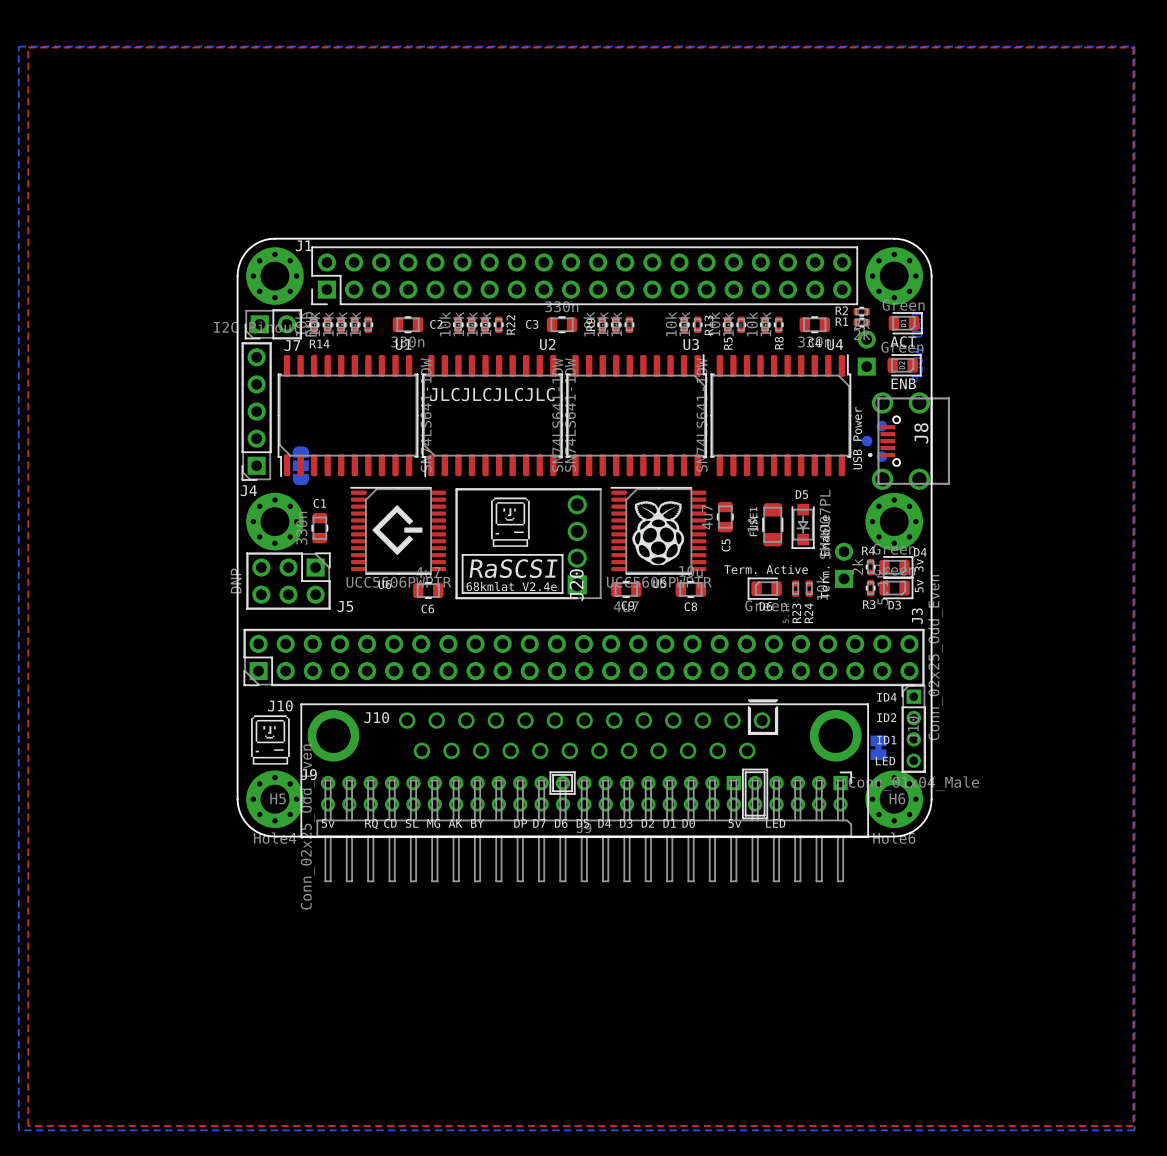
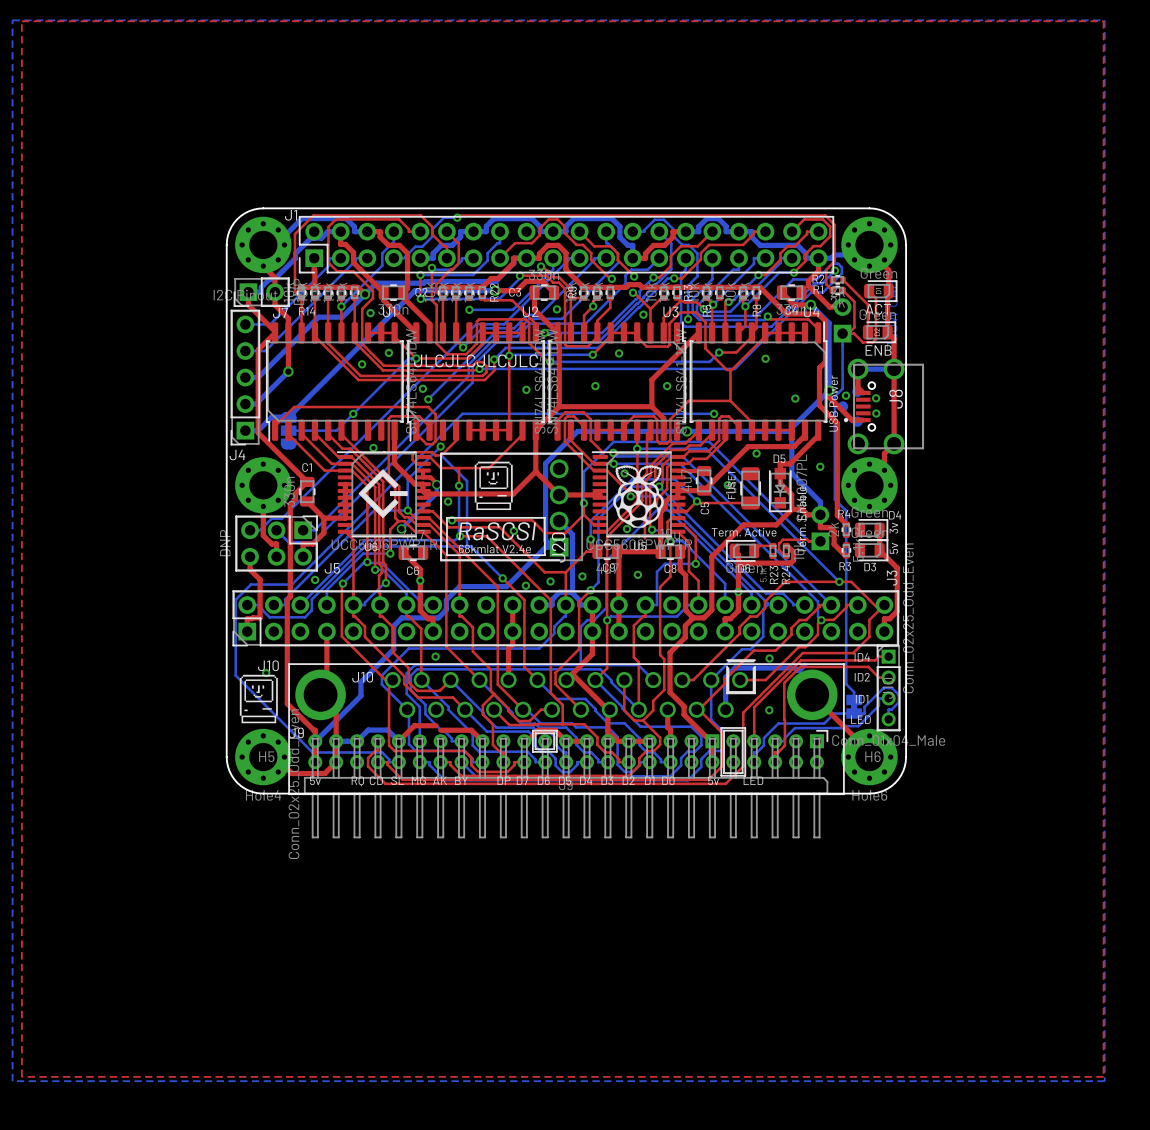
top track: none -> (457, 217) (459, 215) (825, 215) (834, 224) (834, 261) (826, 269) (826, 284) (832, 290)
bottom track: none -> (457, 217) (443, 217) (432, 229) (432, 236) (422, 246) (415, 246) (405, 258) (393, 258)
via: none -> (457, 217)
top track: none -> (340, 231) (340, 244) (345, 244) (353, 252) (353, 262) (383, 292)
bottom track: none -> (340, 231) (327, 231) (321, 238) (310, 238) (295, 253) (295, 258) (274, 279) (269, 279) (261, 287) (261, 292) (248, 292)
top track: none -> (367, 231) (380, 231) (380, 236) (388, 245) (399, 245) (407, 253) (407, 288) (403, 292) (403, 297) (429, 323) (429, 332)
bottom track: none -> (367, 231) (354, 231) (354, 226) (346, 218) (302, 218) (284, 236)
bottom track: none -> (393, 231) (393, 243) (382, 253) (382, 265) (341, 306)
top track: none -> (420, 231) (408, 231) (399, 219) (335, 219) (328, 226) (328, 262) (337, 271) (353, 271) (372, 291) (372, 298) (362, 308) (362, 344) (383, 365) (473, 365) (476, 362) (482, 362) (486, 366) (486, 372) (482, 375) (360, 375) (328, 343) (328, 332)
top track: none -> (446, 231) (458, 243) (458, 263) (436, 284) (436, 291) (442, 298) (442, 332)
bottom track: none -> (500, 231) (500, 243) (487, 253) (487, 260) (473, 275) (420, 275)
top track: none -> (579, 231) (594, 246) (610, 246) (617, 253) (617, 260) (634, 276)
bottom track: none -> (606, 231) (606, 243) (618, 253) (618, 262) (562, 318) (529, 318) (515, 332) (495, 332) (428, 399)
bottom track: none -> (632, 231) (644, 231) (654, 219) (663, 219) (673, 229) (673, 235) (682, 244) (688, 244) (697, 253) (697, 276) (688, 285) (688, 319)
bottom track: none -> (659, 231) (671, 243) (671, 269) (598, 342) (496, 342) (472, 366) (472, 382) (313, 542) (288, 542) (276, 530)
top track: none -> (685, 231) (673, 231) (673, 236) (664, 245) (653, 245) (645, 253) (645, 258) (632, 258)
bottom track: none -> (685, 231) (698, 231) (698, 226) (706, 218) (718, 218) (726, 226) (726, 231) (751, 231) (751, 236) (760, 245) (797, 245) (805, 253) (805, 258) (831, 258) (834, 254) (849, 254) (860, 266) (869, 266)
top track: none -> (712, 231) (697, 246) (680, 246) (670, 256) (670, 266) (659, 277) (653, 277)
top track: none -> (765, 231) (753, 231) (753, 234) (743, 244) (709, 244) (700, 253) (700, 259) (681, 278) (674, 278)
top track: none -> (792, 231) (804, 219) (822, 219) (830, 226) (830, 236) (820, 246) (813, 246) (805, 254) (805, 261) (793, 272)
top track: none -> (818, 231) (807, 231) (807, 234) (794, 246) (787, 246) (780, 253) (780, 259) (765, 275) (758, 275)
top track: none -> (314, 258) (314, 287)
bottom track: none -> (340, 258) (329, 258) (329, 265) (270, 324) (245, 324)
bottom track: none -> (367, 258) (355, 258) (355, 260) (265, 351) (245, 351)
bottom track: none -> (420, 258) (433, 258) (433, 253) (441, 245) (452, 245) (460, 236) (460, 231) (486, 231) (486, 226) (493, 218) (532, 218) (540, 226) (540, 231) (565, 231) (565, 226) (573, 218) (611, 218) (619, 226) (619, 237) (627, 245) (632, 245) (632, 258)
top track: none -> (446, 258) (446, 246) (444, 246) (432, 234) (432, 226) (420, 215) (313, 215) (294, 234) (294, 291) (301, 298) (301, 332)
bottom track: none -> (473, 258) (461, 258) (452, 269) (433, 269) (431, 267)
top track: none -> (500, 258) (515, 243) (531, 243) (539, 235) (539, 228) (548, 219) (557, 219) (564, 226) (564, 232) (576, 244) (583, 244) (591, 253) (591, 259) (611, 278)
bottom track: none -> (526, 258) (513, 258) (513, 263) (495, 281) (376, 283) (342, 317) (318, 317) (258, 377) (245, 377)
bottom track: none -> (553, 258) (553, 269) (513, 309) (469, 309)
bottom track: none -> (579, 258) (568, 258) (504, 324) (476, 324) (281, 518) (271, 518) (261, 530) (250, 530)
bottom track: none -> (606, 258) (594, 258) (539, 314) (527, 314) (514, 328) (482, 328) (463, 347)
bottom track: none -> (659, 258) (647, 269) (631, 269) (625, 275) (625, 283) (585, 323) (529, 323) (517, 336) (496, 336) (468, 364) (468, 376) (314, 530) (303, 530)
bottom track: none -> (685, 258) (685, 269) (681, 274) (681, 322) (685, 326) (771, 326) (814, 283) (822, 283) (835, 270)
bottom track: none -> (712, 258) (712, 279) (692, 298) (692, 313) (699, 319) (764, 319) (767, 316)
bottom track: none -> (738, 258) (738, 269) (733, 269) (696, 305) (696, 311) (701, 315) (756, 315) (793, 279) (816, 279) (832, 263) (838, 263) (841, 267) (841, 273) (822, 292) (811, 292) (734, 368) (479, 368)
bottom track: none -> (765, 258) (753, 258) (753, 263) (713, 304)
bottom track: none -> (792, 258) (780, 258) (780, 262) (730, 311) (706, 311) (703, 309)
top track: none -> (818, 258) (818, 271) (808, 281) (808, 285) (829, 307) (842, 307)
top track: none -> (263, 266) (275, 277) (275, 305) (288, 318) (288, 371)
top track: none -> (884, 266) (888, 270) (887, 332) (894, 338) (894, 443) (884, 453) (884, 470) (890, 476) (890, 494) (873, 510)
top track: none -> (541, 266) (553, 277) (559, 277) (570, 289) (570, 332)
via: none -> (541, 266)
top track: none -> (431, 267) (431, 300) (436, 305) (436, 343) (447, 354) (466, 354) (476, 343) (476, 321) (479, 319) (525, 319) (529, 322) (529, 343) (550, 361)
via: none -> (431, 267)
via: none -> (835, 270)
bottom track: none -> (793, 272) (779, 272) (745, 306)
via: none -> (793, 272)
top track: none -> (420, 275) (420, 298)
via: none -> (420, 275)
bottom track: none -> (758, 275) (731, 301) (728, 301)
via: none -> (758, 275)
top track: none -> (519, 275) (546, 275) (553, 282) (558, 282) (565, 288) (565, 344) (566, 346) (588, 346) (597, 337) (597, 320) (610, 307) (610, 298)
bottom track: none -> (519, 275) (519, 278) (499, 298) (420, 298)
via: none -> (519, 275)
via: none -> (634, 276)
bottom track: none -> (653, 277) (639, 291) (639, 296) (602, 332) (544, 332)
via: none -> (653, 277)
via: none -> (611, 278)
bottom track: none -> (674, 278) (667, 278) (598, 347) (505, 347) (494, 359)
via: none -> (674, 278)
top track: none -> (843, 279) (867, 304) (867, 332)
top track: none -> (301, 287) (358, 287) (365, 294)
top track: none -> (442, 287) (482, 287) (491, 278) (498, 278) (513, 262) (513, 258) (539, 258) (539, 253) (547, 245) (558, 245) (565, 252) (565, 269) (583, 287) (626, 287) (628, 284) (639, 284) (642, 287) (663, 287)
top track: none -> (664, 287) (706, 287)
top track: none -> (706, 287) (760, 287) (786, 314) (818, 314) (825, 321) (825, 361) (819, 367) (819, 405) (837, 423) (837, 515) (846, 524)
top track: none -> (495, 290) (517, 290) (526, 281) (542, 281) (554, 292)
bottom track: none -> (495, 290) (415, 290) (288, 417) (271, 417) (258, 430) (245, 430)
via: none -> (495, 290)
top track: none -> (843, 290) (854, 301) (854, 327) (848, 333)
top track: none -> (869, 291) (875, 297) (875, 339) (872, 342) (862, 342) (854, 333) (842, 333)
top track: none -> (248, 292) (248, 305) (275, 331) (258, 349) (258, 432) (307, 481) (295, 493) (295, 499) (290, 504) (290, 596) (287, 599) (287, 703) (315, 730) (315, 762)
top track: none -> (383, 292) (383, 300) (416, 332)
top track: none -> (534, 292) (534, 309) (559, 334) (559, 406)
top track: none -> (632, 292) (650, 309)
via: none -> (632, 292)
top track: none -> (781, 292) (794, 304) (810, 304)
via: none -> (365, 294)
top track: none -> (314, 298) (314, 336) (358, 380) (484, 380) (494, 370) (494, 359)
top track: none -> (328, 298) (328, 332)
top track: none -> (341, 298) (341, 332)
top track: none -> (354, 298) (354, 332)
top track: none -> (455, 298) (456, 340) (463, 347)
top track: none -> (482, 298) (484, 300) (512, 300) (535, 323) (535, 332) (544, 332)
top track: none -> (570, 298) (583, 298)
top track: none -> (597, 298) (593, 301) (593, 306) (584, 315) (584, 332)
top track: none -> (663, 298) (661, 298) (650, 309)
top track: none -> (706, 298) (712, 303) (712, 332)
top track: none -> (743, 298) (743, 304) (745, 306) (745, 326) (738, 332)
top track: none -> (756, 298) (756, 328) (751, 332) (751, 336) (736, 352) (719, 352)
via: none -> (420, 298)
top track: none -> (725, 301) (725, 332)
via: none -> (728, 301)
via: none -> (713, 304)
bottom track: none -> (810, 304) (829, 323) (829, 390) (791, 427) (791, 473) (820, 501) (820, 514)
via: none -> (810, 304)
via: none -> (593, 306)
via: none -> (745, 306)
via: none -> (341, 306)
via: none -> (556, 309)
top track: none -> (650, 309) (650, 332)
top track: none -> (703, 309) (697, 302) (680, 301) (663, 317) (663, 332)
via: none -> (703, 309)
via: none -> (469, 309)
via: none -> (370, 313)
via: none -> (643, 314)
top track: none -> (767, 316) (770, 319) (808, 319) (818, 329) (818, 332)
via: none -> (767, 316)
via: none -> (688, 319)
top track: none -> (354, 332) (354, 342) (383, 370) (479, 368)
top track: none -> (368, 332) (394, 332) (394, 336) (416, 358) (468, 358) (482, 343) (482, 332) (522, 332)
top track: none -> (509, 332) (509, 430) (469, 430)
via: none -> (544, 332)
top track: none -> (698, 332) (651, 379) (651, 406)
top track: none -> (804, 332) (765, 332) (765, 336) (731, 369) (726, 369) (705, 348) (705, 322) (695, 312) (680, 312) (669, 323) (668, 346) (646, 346) (637, 337) (637, 332) (610, 332) (610, 336) (592, 354)
bottom track: none -> (842, 333) (842, 388) (834, 396) (834, 499) (846, 510) (846, 684) (854, 692) (854, 699)
via: none -> (463, 347)
bottom track: none -> (719, 352) (709, 361) (550, 361)
via: none -> (719, 352)
via: none -> (388, 352)
via: none -> (619, 353)
bottom track: none -> (592, 354) (509, 355)
via: none -> (592, 354)
via: none -> (509, 355)
bottom track: none -> (416, 358) (408, 358) (336, 430) (288, 430)
via: none -> (416, 358)
via: none -> (765, 358)
via: none -> (494, 359)
via: none -> (550, 361)
via: none -> (362, 364)
via: none -> (479, 368)
top track: none -> (858, 369) (858, 387) (863, 392)
bottom track: none -> (858, 369) (894, 369)
top track: none -> (730, 369) (730, 400)
bottom track: none -> (288, 371) (258, 401) (258, 404) (245, 404)
via: none -> (288, 371)
via: none -> (595, 386)
via: none -> (667, 386)
via: none -> (422, 388)
via: none -> (526, 389)
top track: none -> (829, 390) (829, 397) (852, 420) (863, 420)
via: none -> (829, 390)
via: none -> (846, 395)
via: none -> (876, 398)
via: none -> (428, 399)
via: none -> (795, 398)
top track: none -> (730, 400) (751, 422) (751, 430) (791, 430)
top track: none -> (730, 400) (688, 400) (670, 419) (670, 440) (667, 443) (659, 443) (657, 441) (657, 419) (653, 416) (633, 416) (623, 426) (623, 430) (597, 430)
top track: none -> (559, 406) (651, 406)
top track: none -> (559, 406) (535, 430) (535, 471)
top track: none -> (651, 406) (663, 418) (663, 430)
via: none -> (353, 413)
bottom track: none -> (714, 413) (462, 413) (291, 584) (251, 584) (235, 599) (235, 675) (312, 752) (382, 752) (389, 759) (389, 762) (398, 762)
via: none -> (714, 413)
via: none -> (876, 413)
top track: none -> (275, 430) (275, 426) (294, 407) (428, 407) (435, 414) (435, 441) (432, 444) (426, 444) (416, 433) (416, 430)
top track: none -> (288, 430) (288, 434) (324, 470) (352, 470) (367, 485) (367, 562)
top track: none -> (301, 430) (301, 433) (331, 463) (351, 463) (375, 487) (375, 569)
top track: none -> (314, 430) (314, 433) (338, 457) (351, 457) (379, 484) (379, 563) (381, 566) (381, 572) (379, 575) (380, 616) (382, 616) (393, 627) (393, 652) (408, 668) (408, 682) (417, 690) (439, 690) (450, 680)
top track: none -> (328, 430) (328, 434) (342, 448) (350, 448) (383, 481) (383, 562) (385, 565) (385, 583)
top track: none -> (341, 430) (341, 434) (395, 488) (395, 518) (398, 521)
top track: none -> (394, 430) (394, 463) (415, 484) (423, 484) (423, 490) (425, 493) (513, 493) (535, 471)
top track: none -> (429, 430) (429, 426) (419, 416) (391, 416) (388, 418) (388, 476) (399, 486) (399, 511) (404, 517) (409, 517) (416, 524) (429, 524) (459, 554) (459, 616) (462, 616) (472, 627) (472, 651) (490, 669) (490, 690) (518, 721) (529, 721) (541, 709) (551, 709)
top track: none -> (456, 430) (456, 440) (441, 455) (435, 455) (432, 452) (414, 452) (412, 454) (412, 459) (416, 463) (423, 463)
top track: none -> (522, 430) (522, 434) (489, 468) (440, 468) (429, 457) (423, 457)
top track: none -> (557, 430) (557, 420) (565, 412) (583, 412) (590, 419) (590, 440) (603, 453)
top track: none -> (570, 430) (570, 440) (594, 463) (613, 463)
top track: none -> (584, 430) (584, 426) (574, 416) (567, 416) (564, 418) (564, 441) (593, 470) (607, 470) (630, 494) (630, 496)
top track: none -> (637, 430) (637, 500) (606, 531) (600, 531)
top track: none -> (650, 430) (647, 433) (647, 473) (642, 478) (642, 500) (607, 536) (607, 668) (595, 680)
top track: none -> (698, 430) (685, 443) (672, 443) (650, 465) (650, 475) (646, 479) (644, 538)
top track: none -> (712, 430) (712, 433) (700, 445) (689, 445) (684, 449) (671, 449) (655, 466) (655, 480) (650, 485) (650, 527) (652, 529)
top track: none -> (725, 430) (725, 440) (706, 458) (693, 458) (688, 463) (670, 463) (667, 467) (667, 489) (656, 499) (656, 504)
top track: none -> (738, 430) (738, 426) (728, 416) (721, 416) (719, 418) (719, 440) (708, 451) (689, 451) (683, 457) (671, 457) (662, 465) (662, 483) (659, 486)
top track: none -> (804, 430) (804, 435) (793, 446) (748, 446) (704, 490) (677, 490)
top track: none -> (818, 430) (818, 435) (790, 463) (780, 463) (780, 483) (791, 494) (791, 509)
via: none -> (687, 431)
bottom track: none -> (791, 431) (577, 431) (545, 463) (545, 540) (552, 547)
bottom track: none -> (440, 446) (407, 479) (407, 510) (374, 510) (285, 599) (285, 605) (273, 605)
via: none -> (440, 446)
via: none -> (373, 447)
bottom track: none -> (637, 448) (706, 448) (839, 581)
via: none -> (637, 448)
bottom track: none -> (613, 452) (616, 456) (682, 456) (831, 605)
via: none -> (613, 452)
via: none -> (756, 453)
bottom track: none -> (442, 456) (467, 481) (467, 546)
bottom track: none -> (613, 463) (680, 463) (818, 601) (818, 617) (821, 620)
via: none -> (613, 463)
via: none -> (820, 466)
top track: none -> (459, 468) (459, 485)
top track: none -> (423, 470) (423, 477) (430, 477) (436, 484)
top track: none -> (677, 470) (704, 471)
top track: none -> (535, 471) (559, 494) (600, 494)
via: none -> (624, 473)
top track: none -> (345, 484) (345, 518) (323, 518)
bottom track: none -> (436, 484) (436, 493) (401, 528)
via: none -> (436, 484)
top track: none -> (677, 484) (677, 497) (669, 497) (660, 512) (660, 551) (617, 551)
via: none -> (727, 485)
bottom track: none -> (459, 485) (459, 536)
via: none -> (459, 485)
via: none -> (659, 486)
bottom track: none -> (630, 496) (660, 496) (767, 603) (763, 609) (763, 636) (750, 649) (741, 649) (711, 680) (711, 719) (722, 730) (722, 749) (709, 750) (701, 759) (701, 766) (687, 780) (444, 780) (429, 764) (429, 762) (419, 762)
via: none -> (630, 496)
top track: none -> (307, 501) (323, 518)
via: none -> (448, 501)
bottom track: none -> (696, 501) (674, 479) (632, 479) (590, 520) (590, 539)
via: none -> (696, 501)
top track: none -> (583, 503) (583, 514)
bottom track: none -> (583, 503) (583, 471) (613, 441) (709, 441) (808, 541) (820, 541)
via: none -> (583, 503)
top track: none -> (750, 503) (698, 503) (696, 501) (686, 511) (677, 511) (677, 504)
top track: none -> (423, 504) (423, 511) (432, 511) (448, 527) (499, 527) (544, 572) (565, 572)
top track: none -> (263, 506) (263, 535) (271, 543) (276, 543) (276, 556)
top track: none -> (791, 509) (776, 524) (743, 524) (711, 556) (711, 609) (703, 617) (693, 617)
top track: none -> (791, 509) (802, 509) (807, 514) (820, 514) (820, 527) (830, 527) (834, 531) (834, 544) (846, 555)
top track: none -> (407, 510) (415, 518) (429, 518) (497, 586) (497, 684) (522, 709)
via: none -> (407, 510)
top track: none -> (583, 514) (565, 533) (545, 533) (532, 520) (452, 520)
top track: none -> (583, 514) (594, 524) (600, 524)
top track: none -> (323, 518) (323, 533) (312, 543) (303, 543) (303, 556)
top track: none -> (677, 518) (671, 518) (667, 522) (667, 538) (670, 541) (670, 576) (660, 586) (660, 655) (664, 659) (664, 689) (653, 700) (653, 710) (643, 720)
via: none -> (452, 520)
top track: none -> (398, 521) (404, 521) (415, 531) (423, 531) (446, 555) (446, 646) (479, 680)
top track: none -> (398, 521) (390, 529) (390, 553)
bottom track: none -> (559, 521) (572, 534) (571, 592)
top track: none -> (677, 524) (684, 524) (695, 536) (695, 563)
via: none -> (401, 528)
via: none -> (627, 528)
bottom track: none -> (652, 529) (659, 530) (670, 541) (682, 541) (725, 583) (725, 605)
via: none -> (652, 529)
top track: none -> (879, 529) (879, 550) (897, 568) (897, 611) (889, 618) (884, 618) (884, 631)
via: none -> (513, 531)
top track: none -> (345, 531) (353, 539) (353, 616) (364, 626) (364, 636) (404, 676) (404, 683) (417, 697) (452, 697) (465, 709)
top track: none -> (677, 531) (688, 542) (688, 571) (698, 580) (698, 605)
bottom track: none -> (459, 536) (455, 540) (365, 540) (300, 605)
top track: none -> (460, 536) (486, 536) (550, 600) (550, 693) (562, 705) (562, 724)
via: none -> (460, 536)
top track: none -> (590, 539) (590, 551)
via: none -> (590, 539)
via: none -> (670, 541)
top track: none -> (820, 541) (782, 539) (779, 543) (779, 549) (786, 555)
top track: none -> (773, 545) (759, 545) (754, 550)
top track: none -> (786, 545) (793, 552) (793, 560) (790, 563) (738, 563)
bottom track: none -> (559, 547) (545, 547) (506, 586) (459, 586) (446, 599) (446, 609) (438, 617) (401, 617) (393, 626) (393, 649) (360, 682) (360, 695) (315, 741)
top track: none -> (734, 550) (738, 554) (738, 610) (730, 618) (725, 618) (725, 631)
top track: none -> (597, 551) (586, 551) (565, 572)
top track: none -> (618, 551) (618, 631)
top track: none -> (680, 551) (680, 569) (685, 575) (685, 610) (693, 617)
top track: none -> (403, 552) (420, 569) (420, 610) (428, 618) (433, 618) (433, 631)
bottom track: none -> (390, 553) (363, 553) (326, 589) (326, 605)
via: none -> (390, 553)
top track: none -> (250, 556) (250, 569) (260, 579) (260, 617) (247, 618) (247, 631)
via: none -> (367, 562)
bottom track: none -> (695, 563) (664, 563) (656, 571) (656, 605) (645, 605)
via: none -> (695, 563)
bottom track: none -> (375, 569) (382, 569) (406, 593) (406, 605)
via: none -> (375, 569)
top track: none -> (565, 572) (565, 605)
via: none -> (637, 574)
via: none -> (582, 576)
top track: none -> (502, 578) (524, 600) (524, 666) (537, 680)
bottom track: none -> (502, 578) (470, 546) (364, 546) (311, 599) (311, 610) (304, 617) (269, 617) (258, 605) (247, 605)
via: none -> (502, 578)
via: none -> (315, 579)
via: none -> (420, 580)
via: none -> (550, 581)
via: none -> (839, 581)
bottom track: none -> (385, 583) (364, 602) (364, 605) (353, 605)
via: none -> (385, 583)
top track: none -> (342, 583) (341, 636) (389, 683)
bottom track: none -> (342, 583) (363, 562) (381, 562) (421, 602) (421, 605) (433, 605)
via: none -> (342, 583)
via: none -> (525, 585)
top track: none -> (590, 590) (579, 601) (579, 649) (555, 672) (555, 684) (580, 709)
bottom track: none -> (590, 590) (598, 582) (598, 518) (630, 486) (659, 486) (766, 593) (783, 593) (793, 605) (804, 605)
via: none -> (590, 590)
bottom track: none -> (571, 592) (579, 600) (579, 605) (592, 605)
bottom track: none -> (571, 592) (559, 592) (552, 599) (552, 605) (539, 605)
via: none -> (738, 591)
top track: none -> (406, 605) (406, 616) (408, 616) (421, 628) (421, 680)
top track: none -> (512, 605) (512, 644) (508, 648) (508, 680)
bottom track: none -> (565, 605) (565, 616) (554, 626) (554, 633) (539, 648) (408, 648) (381, 675) (381, 684) (408, 711) (408, 744) (415, 750) (464, 750) (472, 759) (472, 762) (482, 762)
top track: none -> (592, 605) (592, 654) (566, 680)
top track: none -> (645, 605) (645, 616) (633, 625) (633, 657) (638, 662) (638, 709)
bottom track: none -> (698, 605) (687, 605) (676, 616) (610, 616) (607, 620)
bottom track: none -> (751, 605) (751, 593) (668, 510) (656, 510) (606, 560) (606, 607) (594, 620) (587, 620) (580, 626) (580, 665)
top track: none -> (831, 605) (819, 605) (806, 620) (799, 620) (791, 628) (791, 634) (775, 650) (753, 650) (698, 709)
top track: none -> (857, 605) (846, 605) (846, 607) (833, 619) (821, 619) (818, 623) (818, 634) (805, 647) (798, 647) (765, 680) (740, 680)
top track: none -> (884, 605) (869, 620) (869, 636) (853, 653) (802, 653) (743, 712) (743, 766) (725, 783) (385, 783) (368, 766) (368, 758) (375, 750) (377, 750) (377, 741)
top track: none -> (879, 609) (851, 581) (784, 581) (764, 601) (764, 608) (756, 616) (750, 616) (739, 627) (739, 633) (693, 680) (682, 680)
top track: none -> (693, 617) (685, 625) (685, 637) (670, 652) (670, 692) (684, 706) (684, 714) (712, 741) (712, 762)
via: none -> (607, 620)
via: none -> (821, 620)
top track: none -> (326, 631) (326, 694)
via: none -> (435, 656)
top track: none -> (888, 656) (878, 656) (875, 660) (801, 660) (754, 707) (754, 741)
via: none -> (769, 658)
bottom track: none -> (804, 665) (799, 670) (795, 668) (734, 668) (725, 677) (725, 709)
via: none -> (266, 673)
top track: none -> (572, 674) (607, 709)
top track: none -> (888, 677) (878, 677) (868, 666) (800, 666) (784, 682) (784, 745) (778, 752) (775, 752) (775, 762)
bottom track: none -> (421, 680) (472, 734) (472, 745) (479, 751) (527, 751) (535, 759) (535, 762) (545, 762)
bottom track: none -> (450, 680) (496, 727) (533, 727) (537, 731) (549, 731) (556, 738) (556, 745) (563, 752) (566, 752) (566, 762)
bottom track: none -> (479, 680) (521, 723) (535, 723) (539, 727) (566, 727) (576, 737) (576, 744) (584, 752) (591, 752) (598, 759) (598, 762) (607, 762)
bottom track: none -> (537, 680) (556, 698) (585, 698) (608, 723) (624, 723) (639, 738) (639, 745) (646, 752) (653, 752) (660, 759) (660, 762) (670, 762)
bottom track: none -> (595, 680) (640, 726) (691, 726) (701, 736) (701, 745) (694, 751) (687, 751) (681, 758) (681, 765) (670, 776) (475, 776) (461, 762)
top track: none -> (624, 680) (624, 710) (634, 720) (643, 720)
bottom track: none -> (653, 680) (638, 665) (414, 665) (406, 673) (406, 693) (419, 706) (419, 741)
top track: none -> (389, 683) (389, 745) (394, 750) (464, 750) (471, 757) (471, 765) (478, 771) (507, 771) (514, 764) (514, 762) (524, 762)
top track: none -> (494, 694) (482, 705) (482, 714) (492, 724) (492, 745) (500, 752) (503, 752) (503, 762)
top track: none -> (326, 694) (336, 704) (336, 762) (324, 773) (292, 773) (284, 765)
top track: none -> (812, 694) (854, 737)
bottom track: none -> (888, 698) (878, 698) (878, 705) (858, 726) (794, 728) (784, 738) (784, 741) (775, 741)
bottom track: none -> (465, 709) (486, 731) (528, 731) (535, 738) (535, 746) (541, 751) (548, 751) (555, 758) (555, 765) (562, 772) (570, 772) (577, 764) (577, 762) (587, 762)
top track: none -> (494, 709) (509, 724) (584, 724) (597, 737) (597, 744) (605, 752) (612, 752) (619, 759) (619, 762) (628, 762)
bottom track: none -> (522, 709) (526, 709) (540, 723) (572, 723) (576, 727) (608, 727) (617, 736) (617, 764) (624, 771) (633, 771) (640, 764) (640, 762) (649, 762)
top track: none -> (607, 709) (607, 741)
bottom track: none -> (638, 709) (600, 669) (417, 669) (410, 675) (410, 690) (425, 704) (425, 714) (451, 738) (451, 741) (461, 741)
top track: none -> (667, 709) (667, 727) (670, 730) (670, 741)
top track: none -> (698, 709) (722, 732) (722, 766) (708, 779) (402, 779) (387, 764) (387, 762) (377, 762)
via: none -> (769, 710)
bottom track: none -> (888, 719) (888, 709) (891, 709) (898, 702) (898, 694) (891, 688) (883, 688) (864, 707) (864, 713) (834, 713) (824, 723) (778, 723) (763, 738) (763, 745) (756, 752) (754, 752) (754, 762)
top track: none -> (643, 720) (660, 737) (660, 744) (654, 750) (646, 750) (639, 758) (639, 765) (628, 775) (461, 775) (450, 764) (450, 762) (440, 762)
top track: none -> (436, 725) (414, 725) (398, 741)
top track: none -> (440, 730) (471, 730) (482, 741)
top track: none -> (607, 735) (612, 735) (617, 741) (649, 741)
bottom track: none -> (336, 741) (357, 741) (368, 730) (387, 730) (398, 741)
top track: none -> (524, 741) (527, 741) (538, 730) (555, 730) (566, 741) (587, 741)

